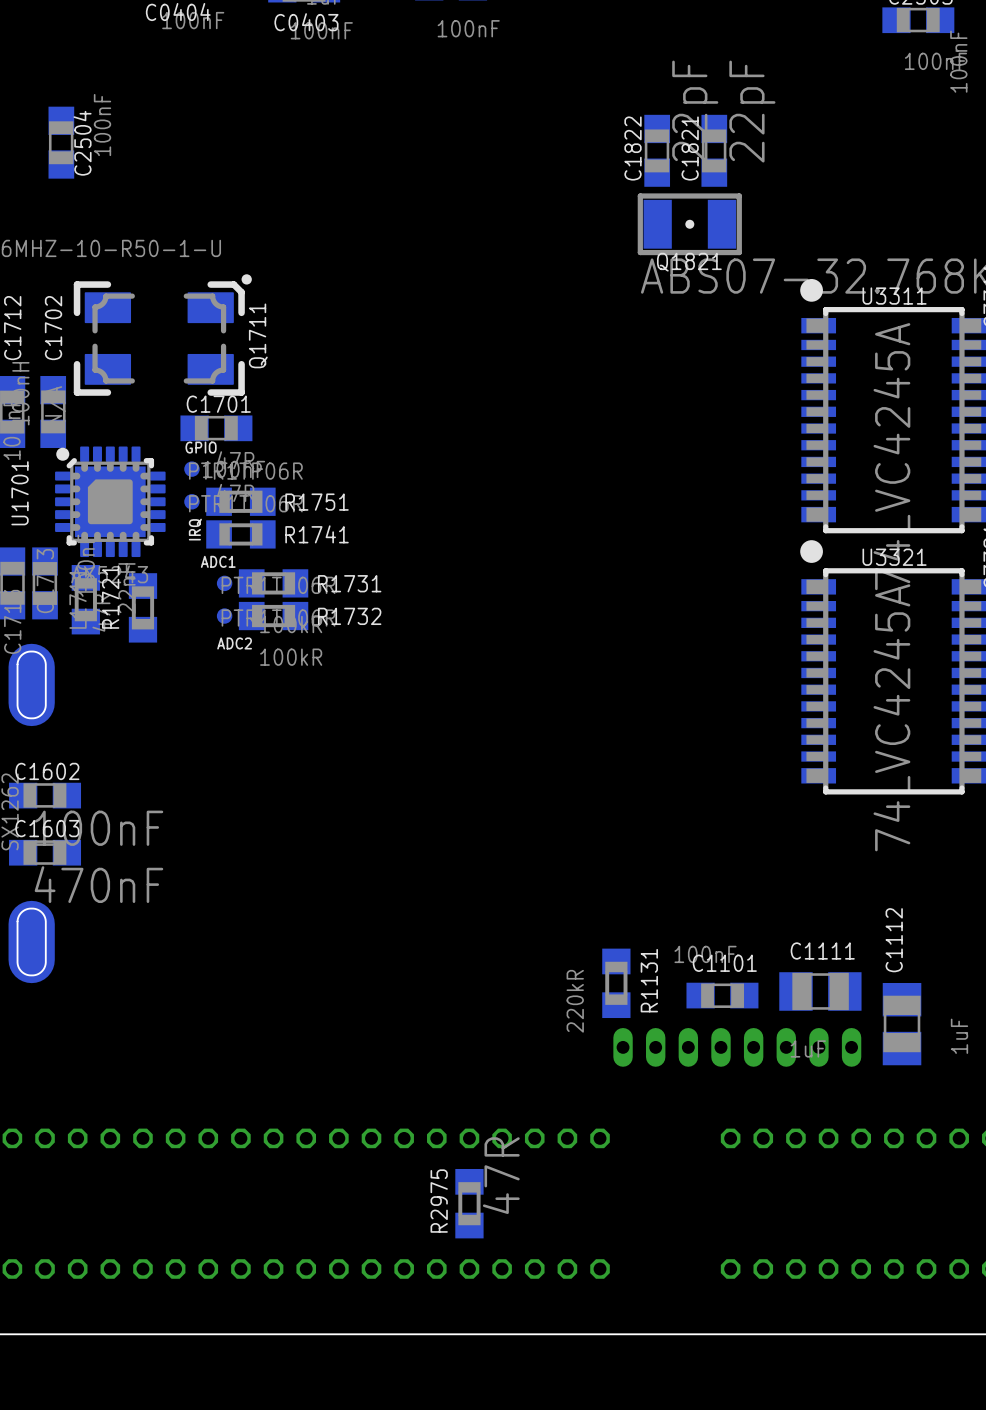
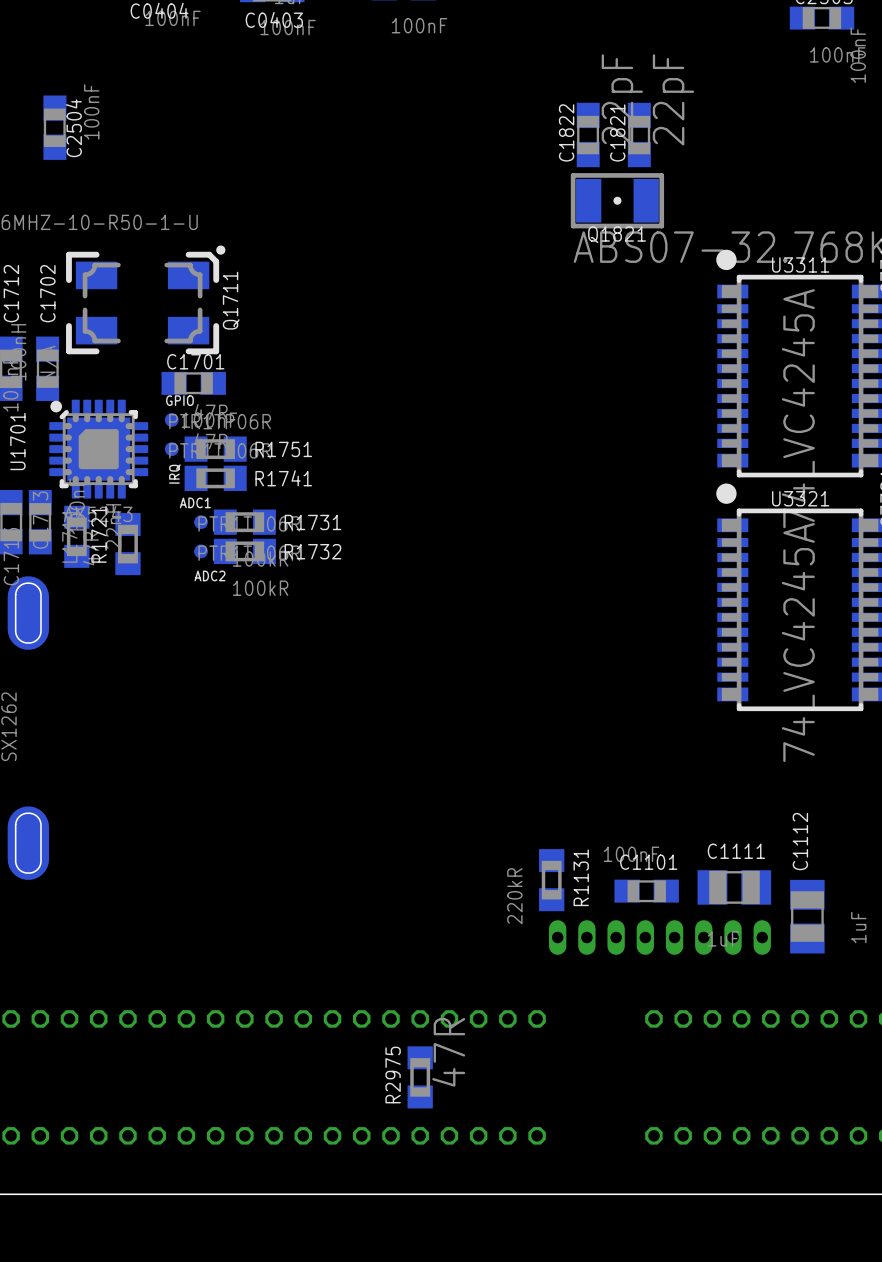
C1602: 100nF (45, 795) -> none
C1603: 470nF (45, 852) -> none

